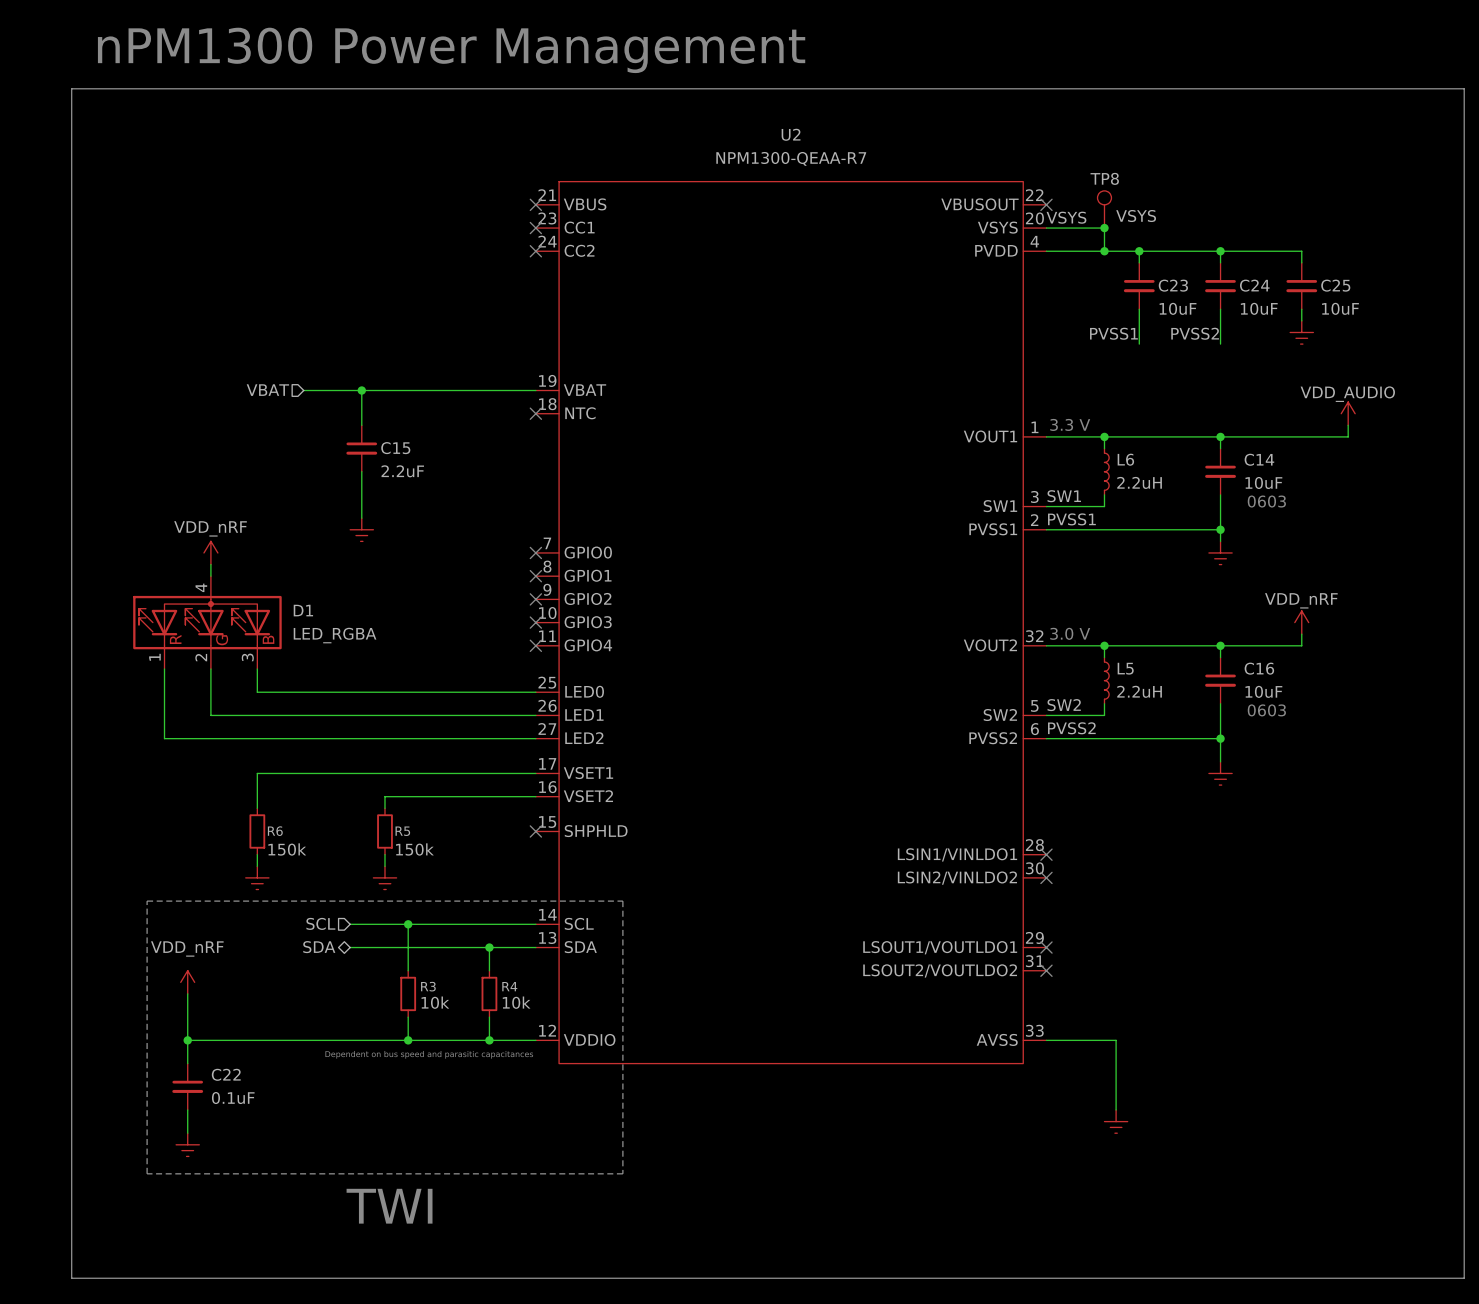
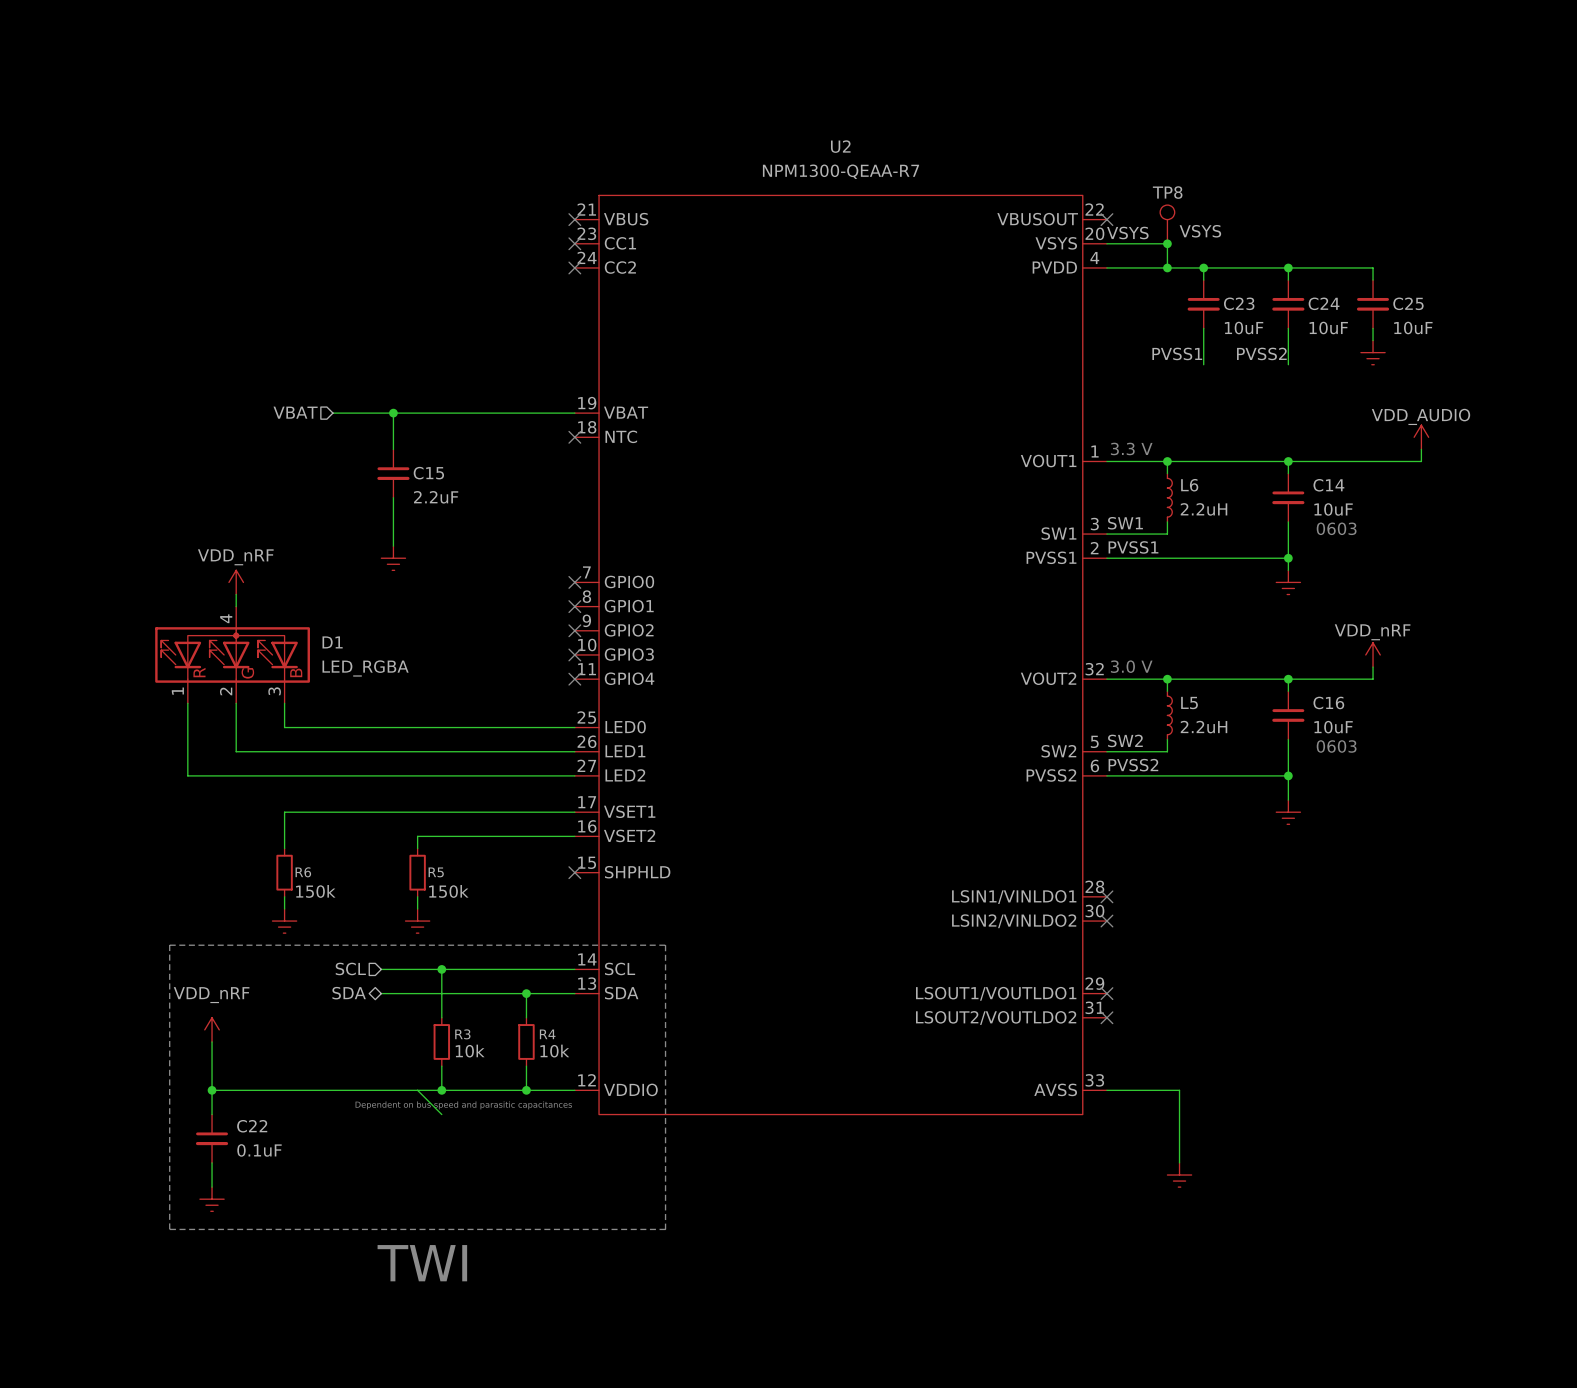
text: nPM1300 Power Management (451, 50) -> none
line: (71, 88) (1464, 88) (1464, 1278) (71, 1278) (71, 88) -> none
wire: none -> (417, 1090) (441, 1114)

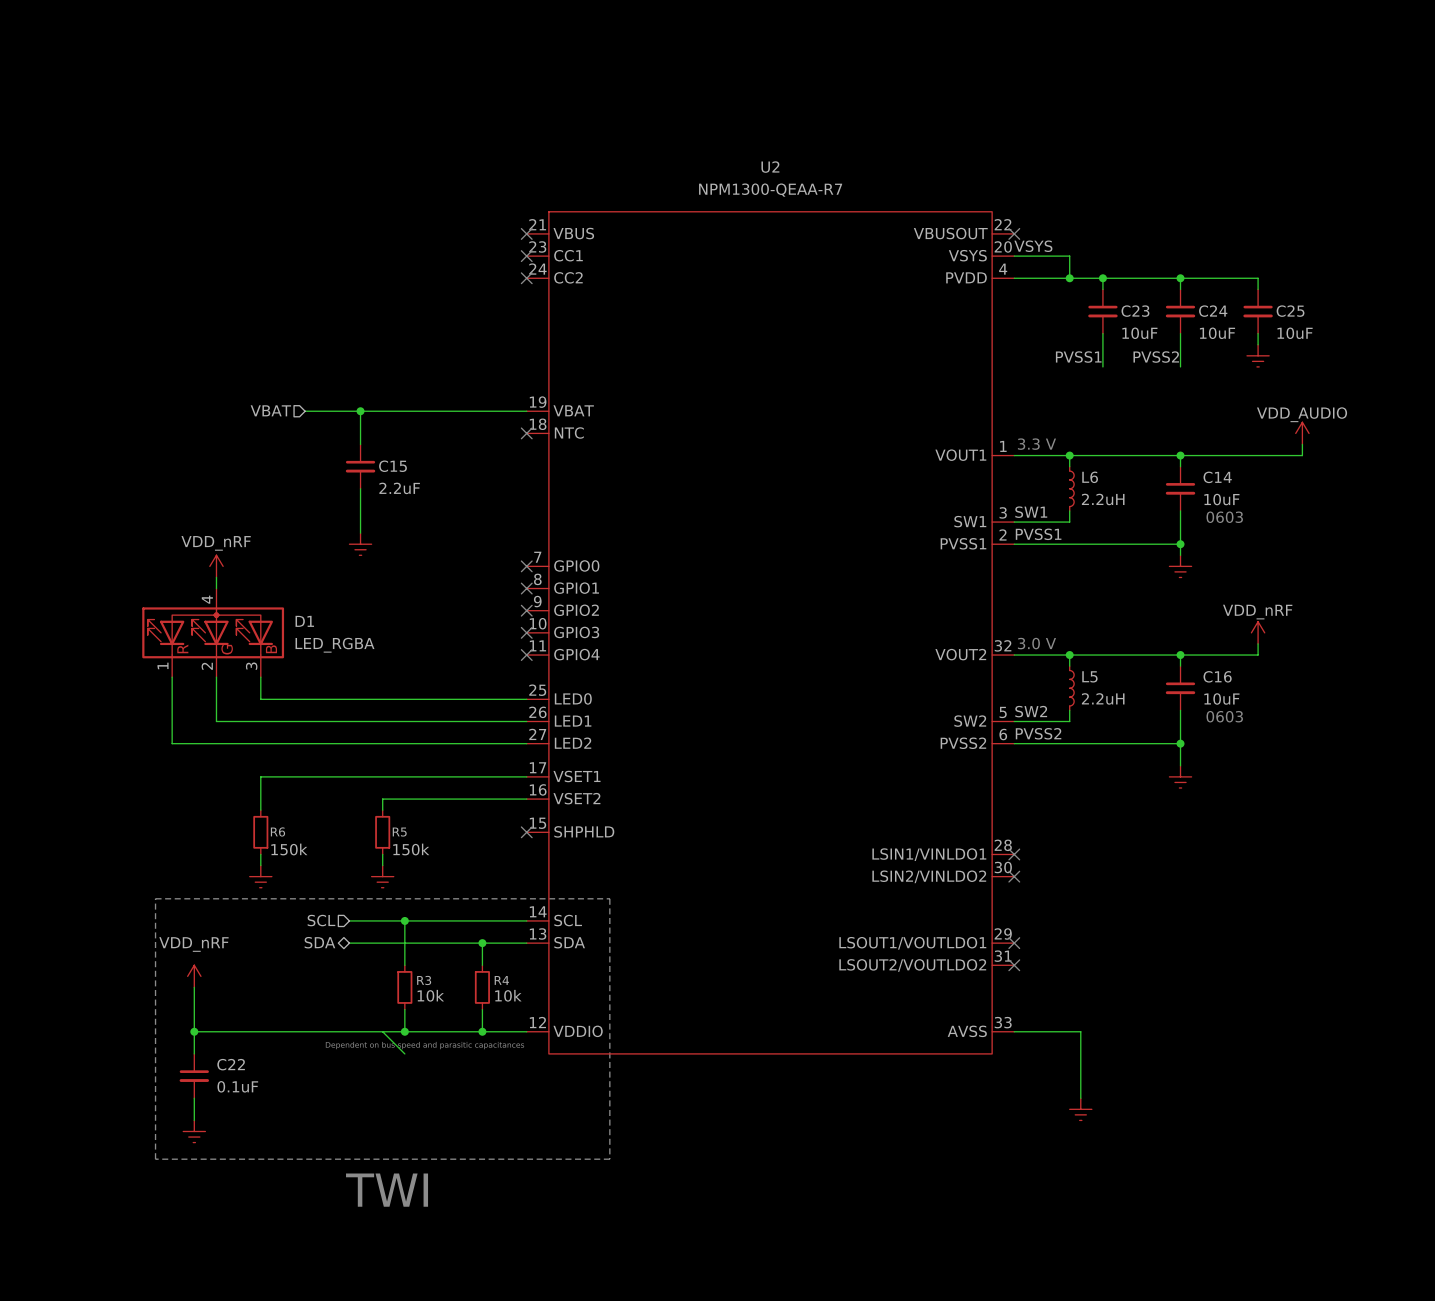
TP8: VSYS (1167, 224) -> none
junction: (1167, 243) -> none

